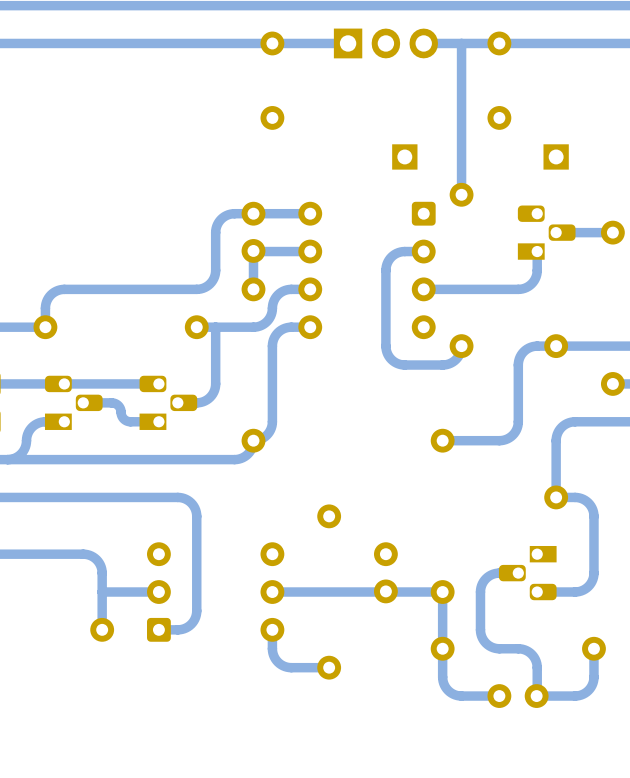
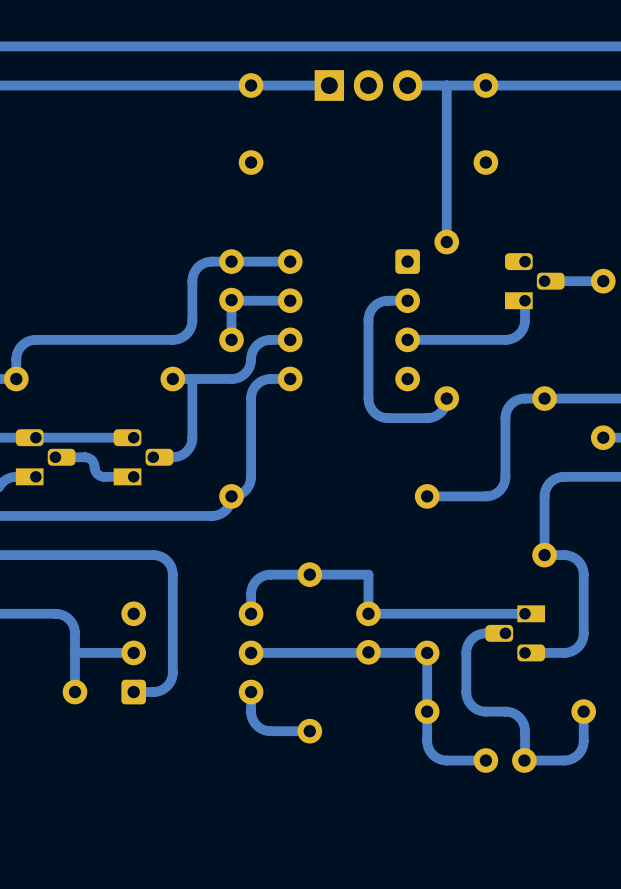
part: (404, 156) -> none
part: (556, 156) -> none
track: none -> (525, 613) (368, 613) (368, 574) (264, 575) (256, 580) (252, 587) (251, 613)

